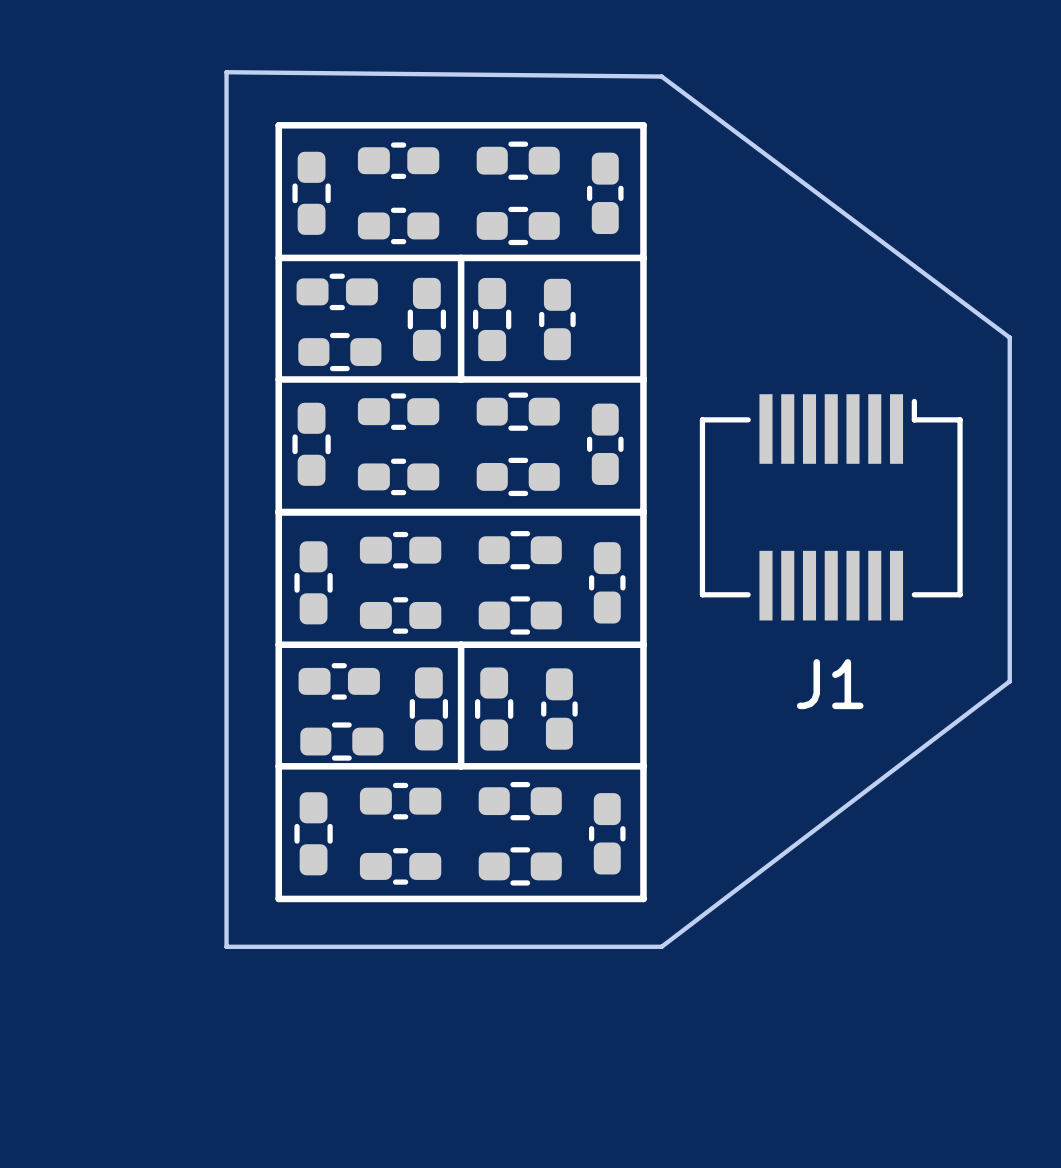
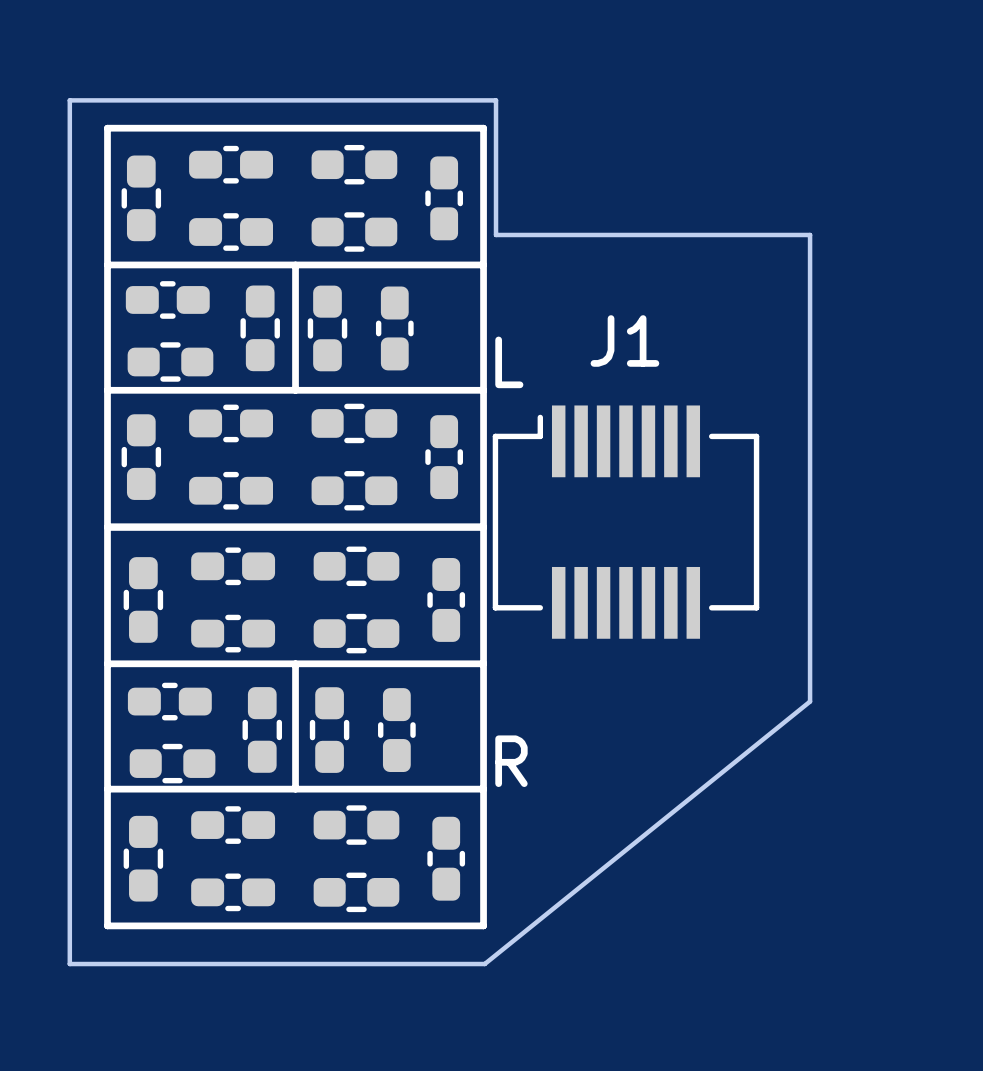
board edge: (226, 72) (226, 946) (661, 946) (1009, 681) (1009, 337) (661, 76) (226, 72) -> (496, 100) (496, 234) (810, 234) (810, 701) (484, 964) (69, 964) (69, 100) (496, 100)
text: none -> L (509, 362)
J1 footprint: [699, 394, 963, 621] -> [492, 405, 760, 639]
J1 name position: J1 (830, 684) -> J1 (624, 340)
text: none -> R (511, 761)

